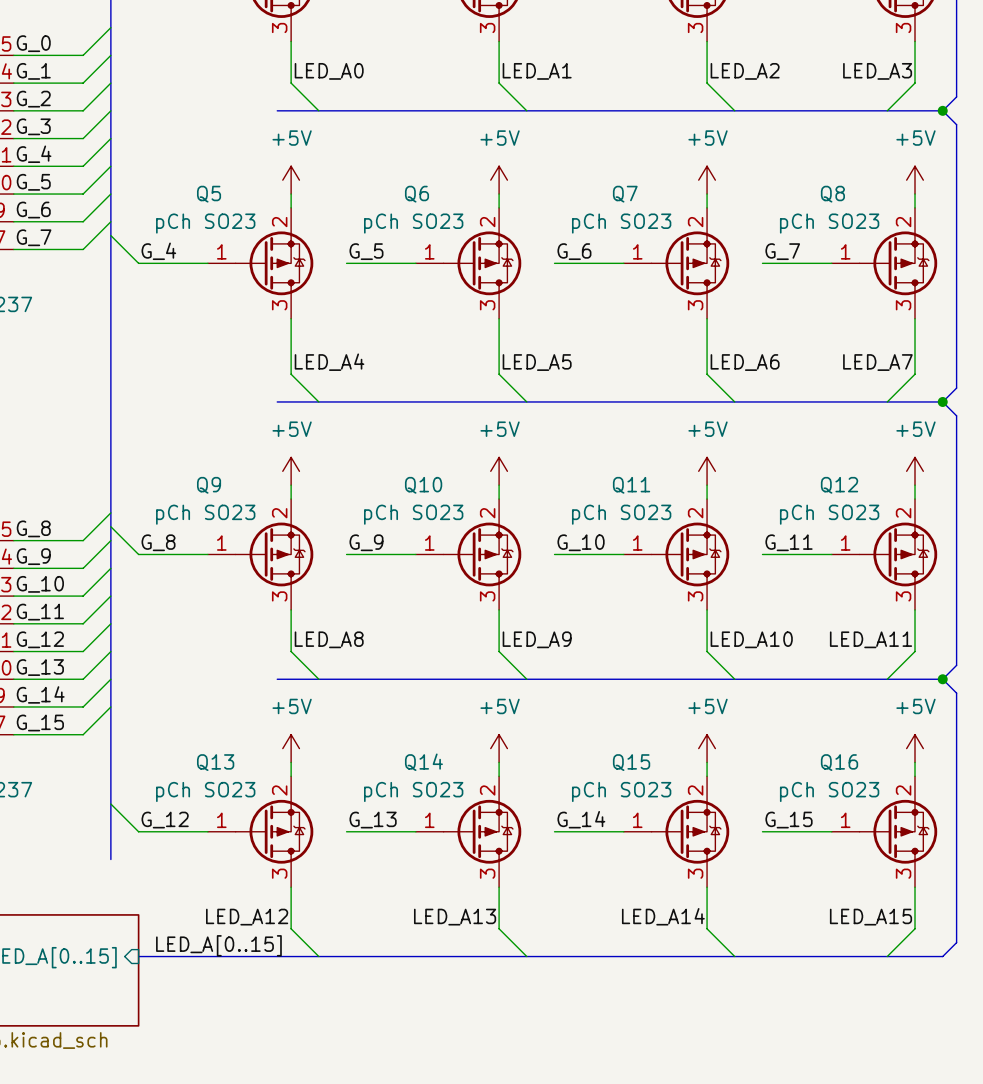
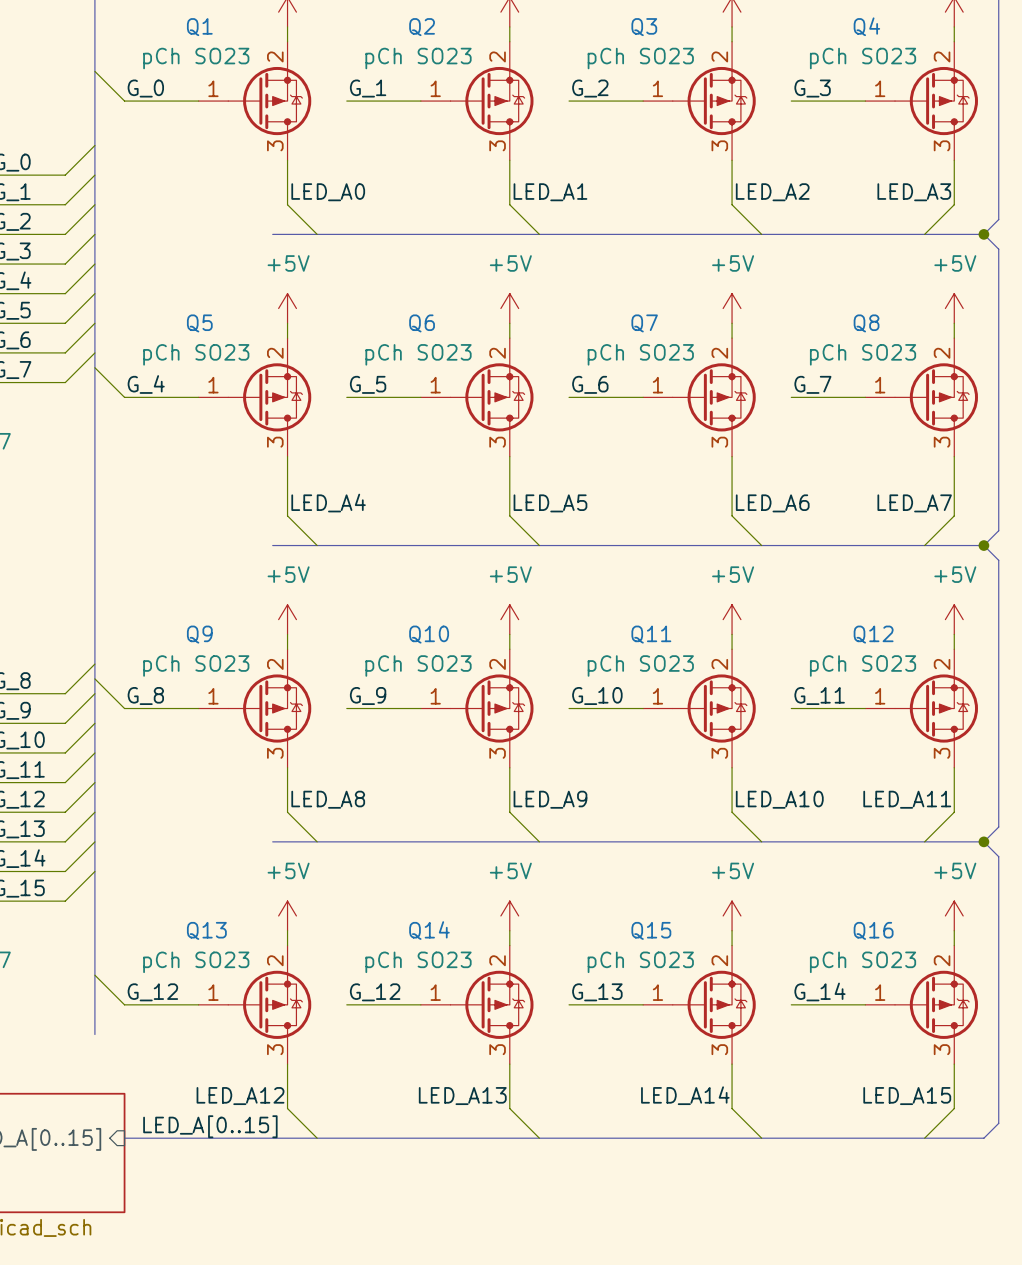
label: G_14 (581, 819) -> G_13 (597, 992)
label: G_13 (373, 820) -> G_12 (375, 992)
label: G_15 (789, 820) -> G_14 (819, 991)

